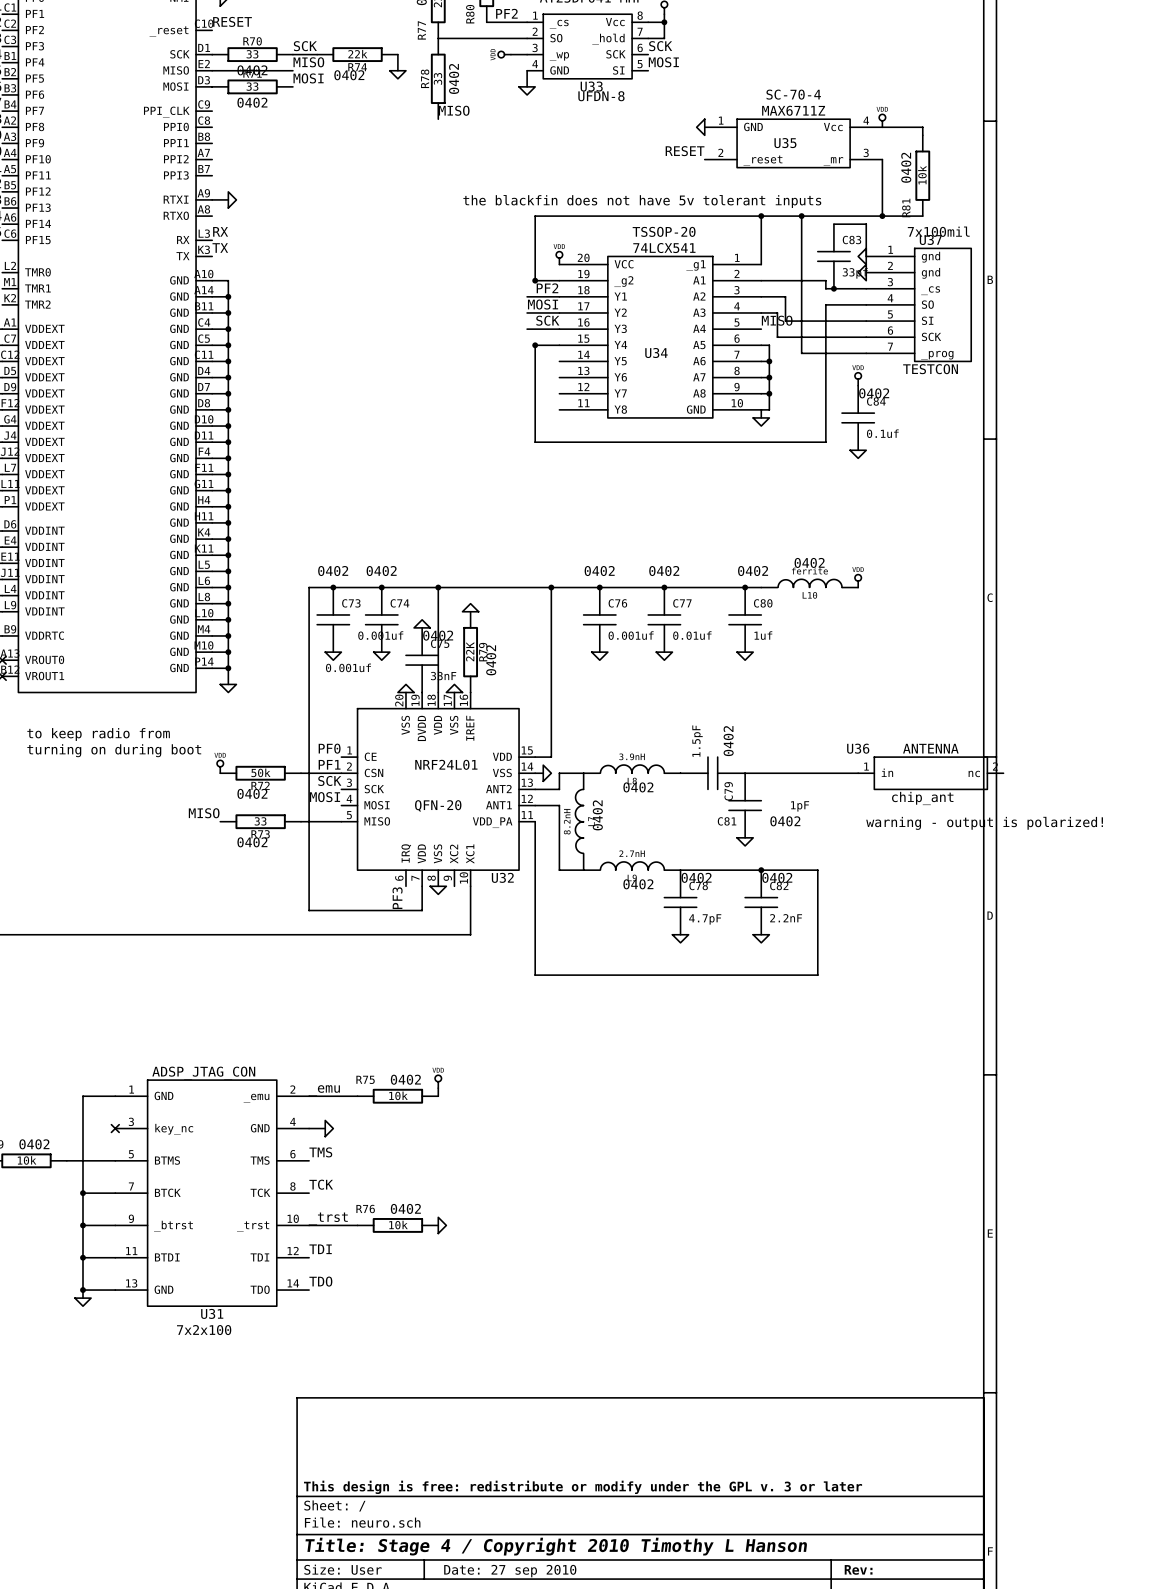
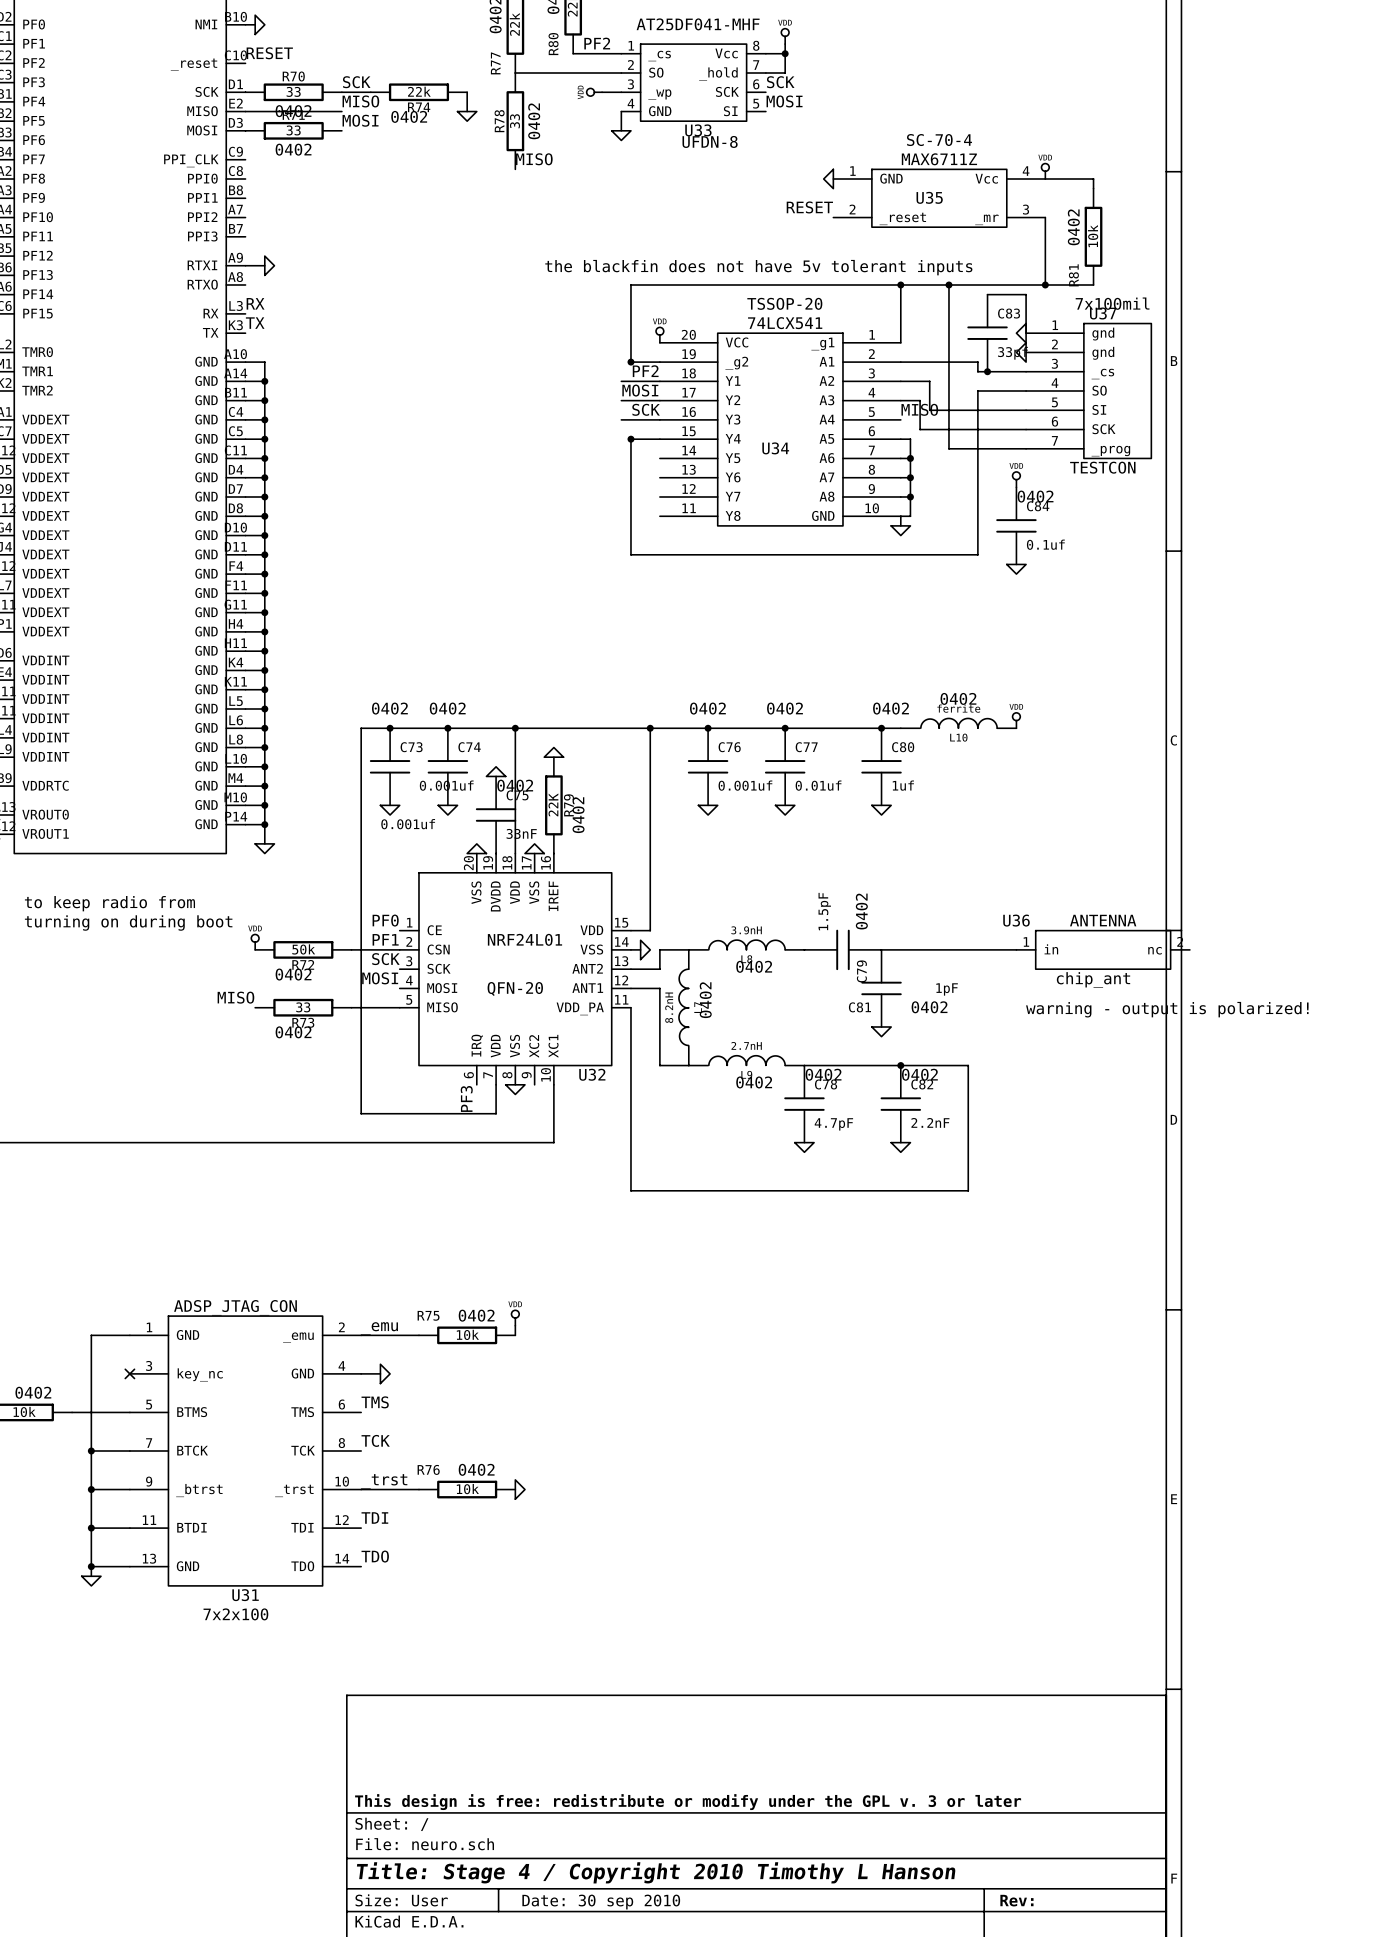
title block: Date: 27 sep 2010 (510, 1571) -> Date: 30 sep 2010 (601, 1902)

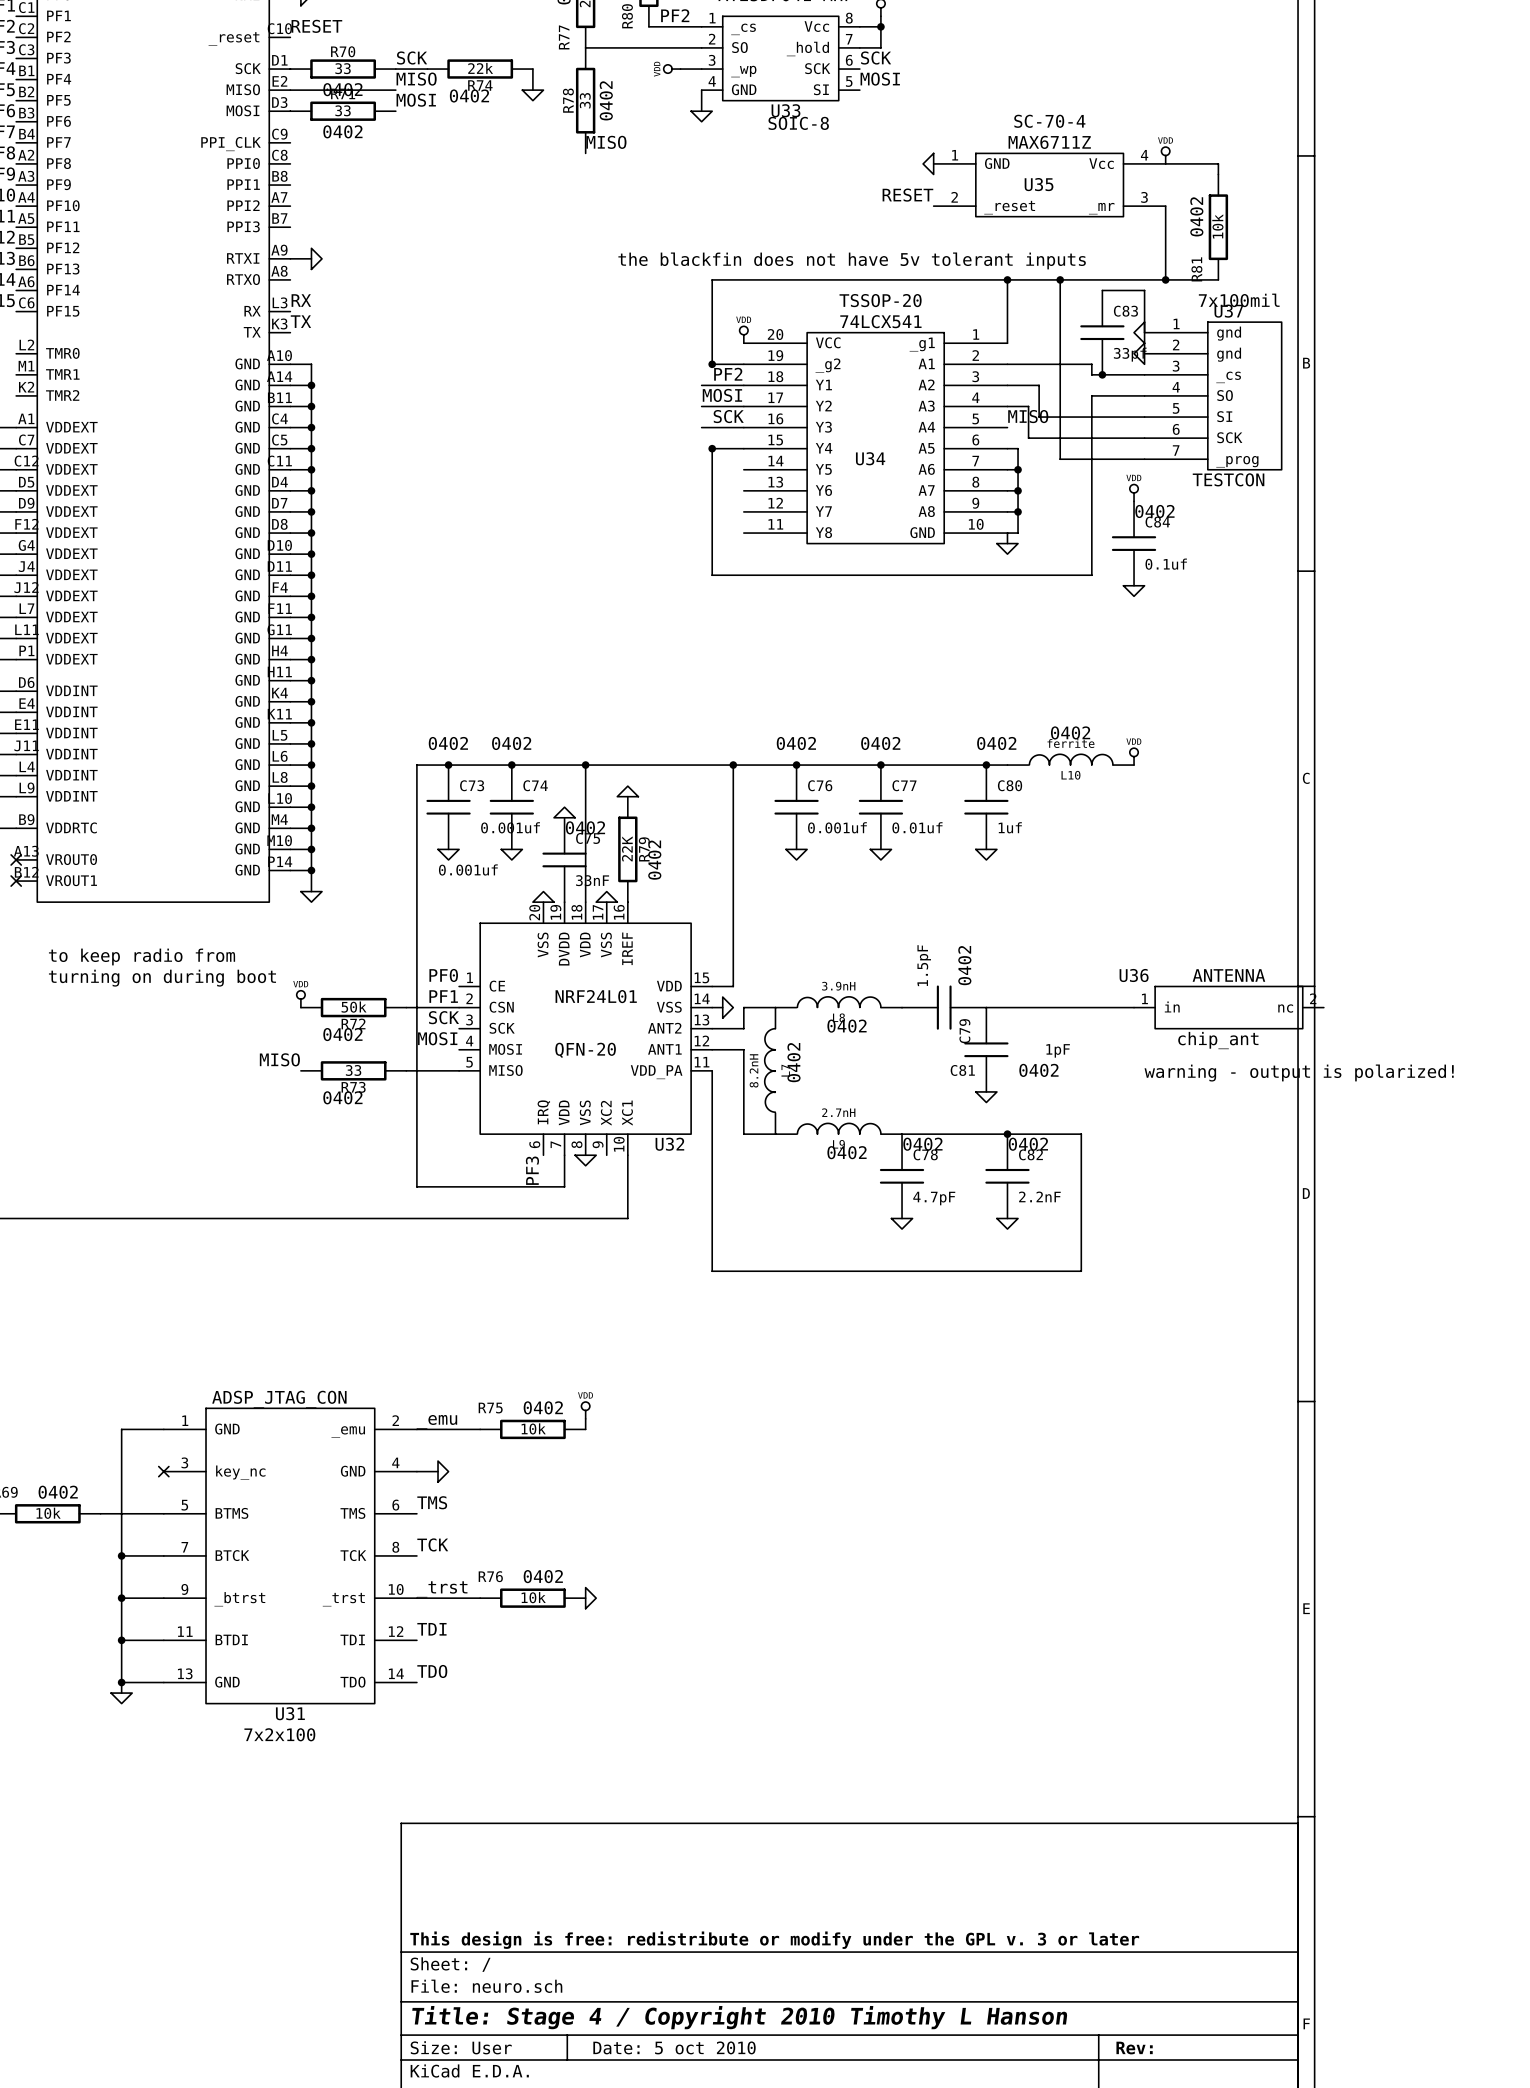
U33 text: UFDN-8 (710, 141) -> SOIC-8 (798, 123)
title block: Date: 30 sep 2010 (601, 1902) -> Date: 5 oct 2010 (674, 2047)

